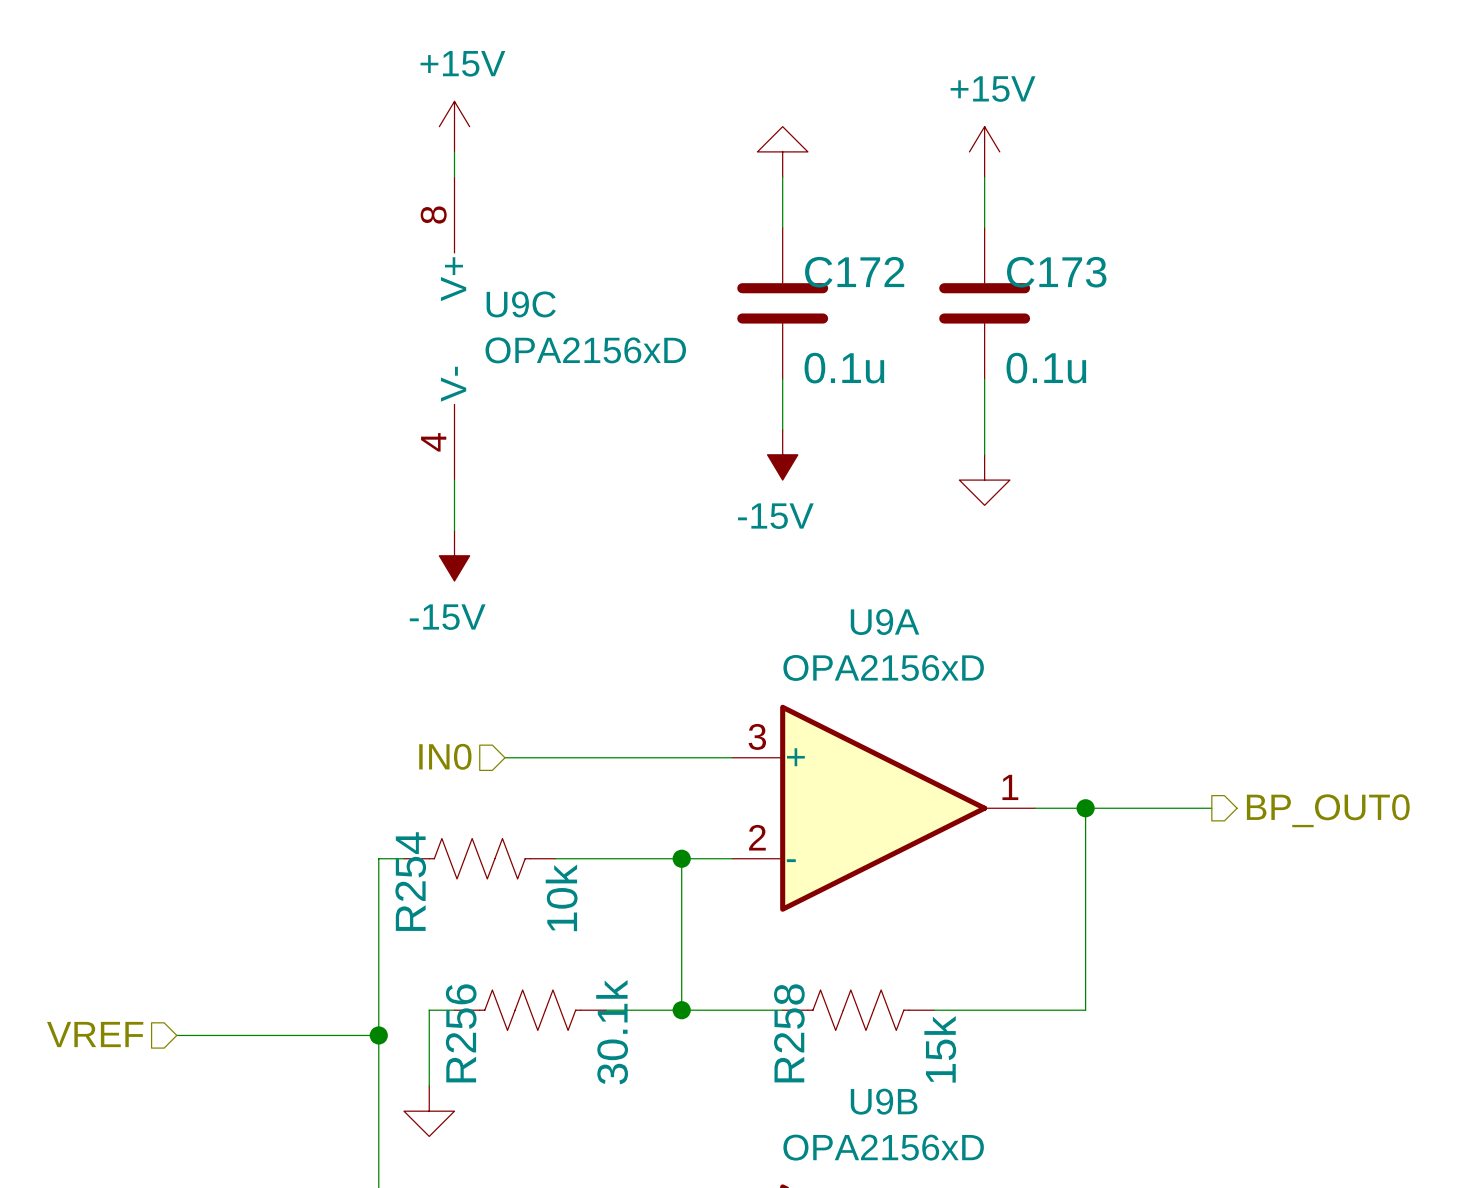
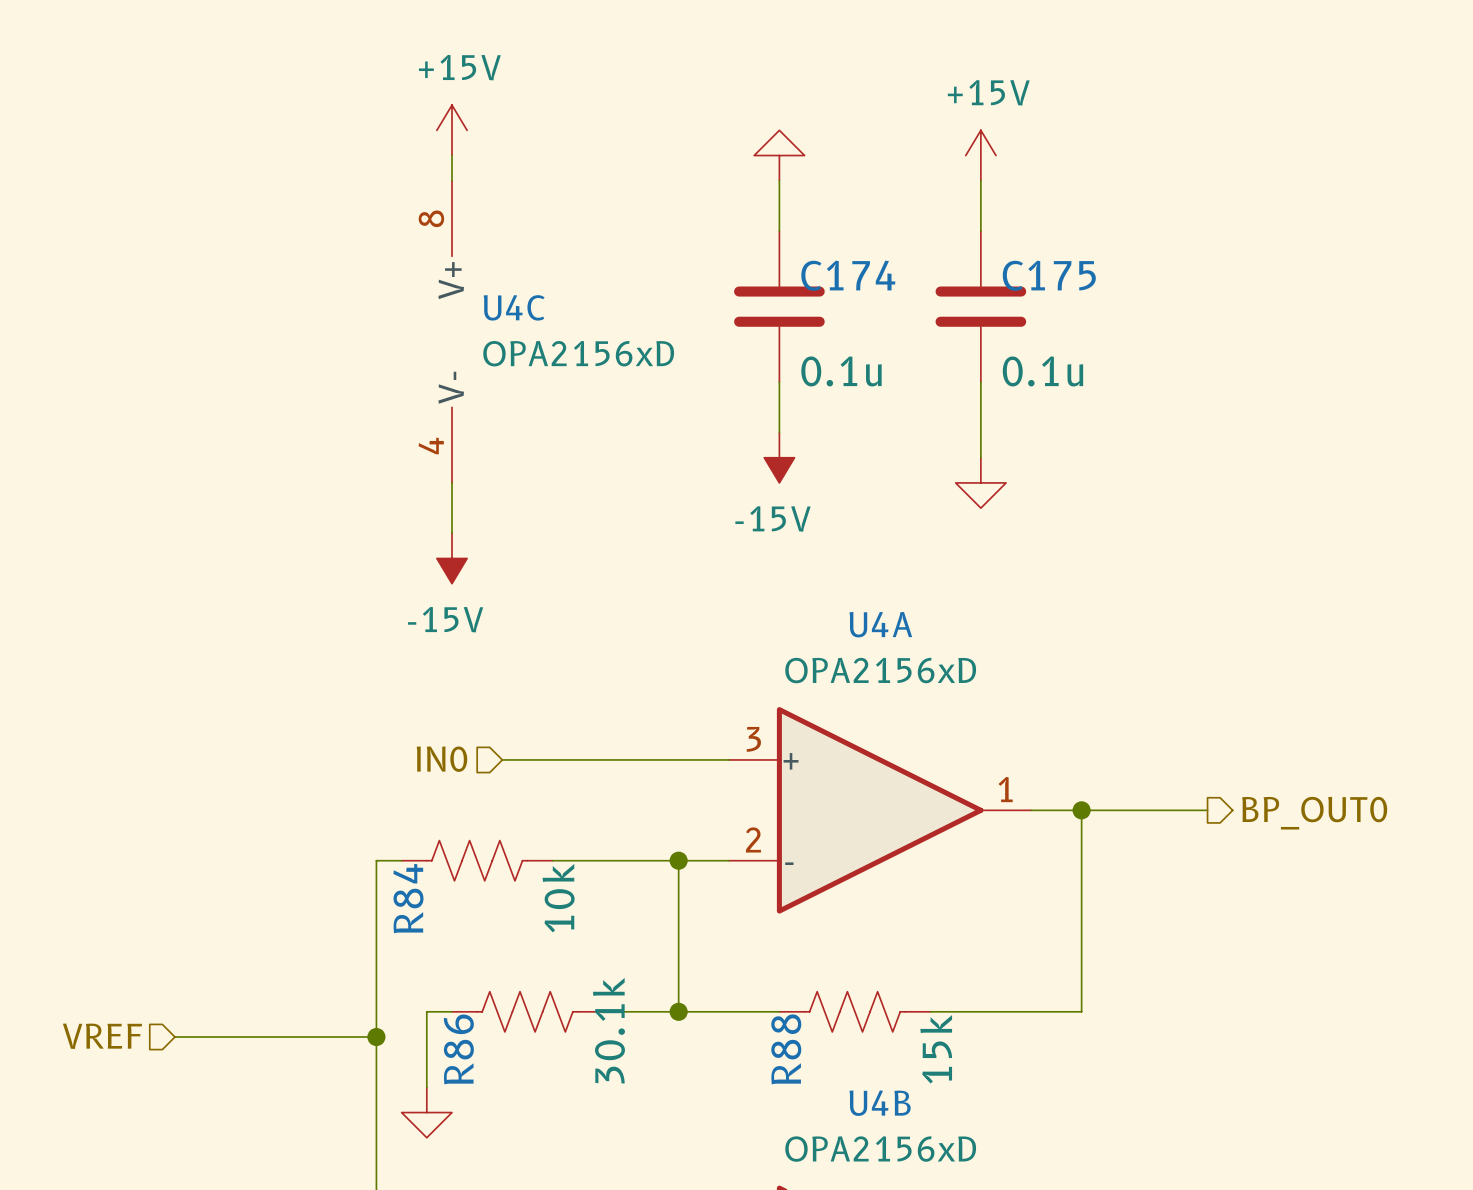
C172 name: C172 (854, 272) -> C174 (848, 275)
C173 name: C173 (1056, 272) -> C175 (1049, 275)
U9C name: U9C (521, 304) -> U4C (514, 307)
U9A name: U9A (885, 622) -> U4A (880, 624)
R254 name: R254 (410, 881) -> R84 (408, 898)
R256 name: R256 (461, 1033) -> R86 (458, 1049)
R258 name: R258 (789, 1033) -> R88 (786, 1049)
U9B name: U9B (884, 1101) -> U4B (880, 1103)

